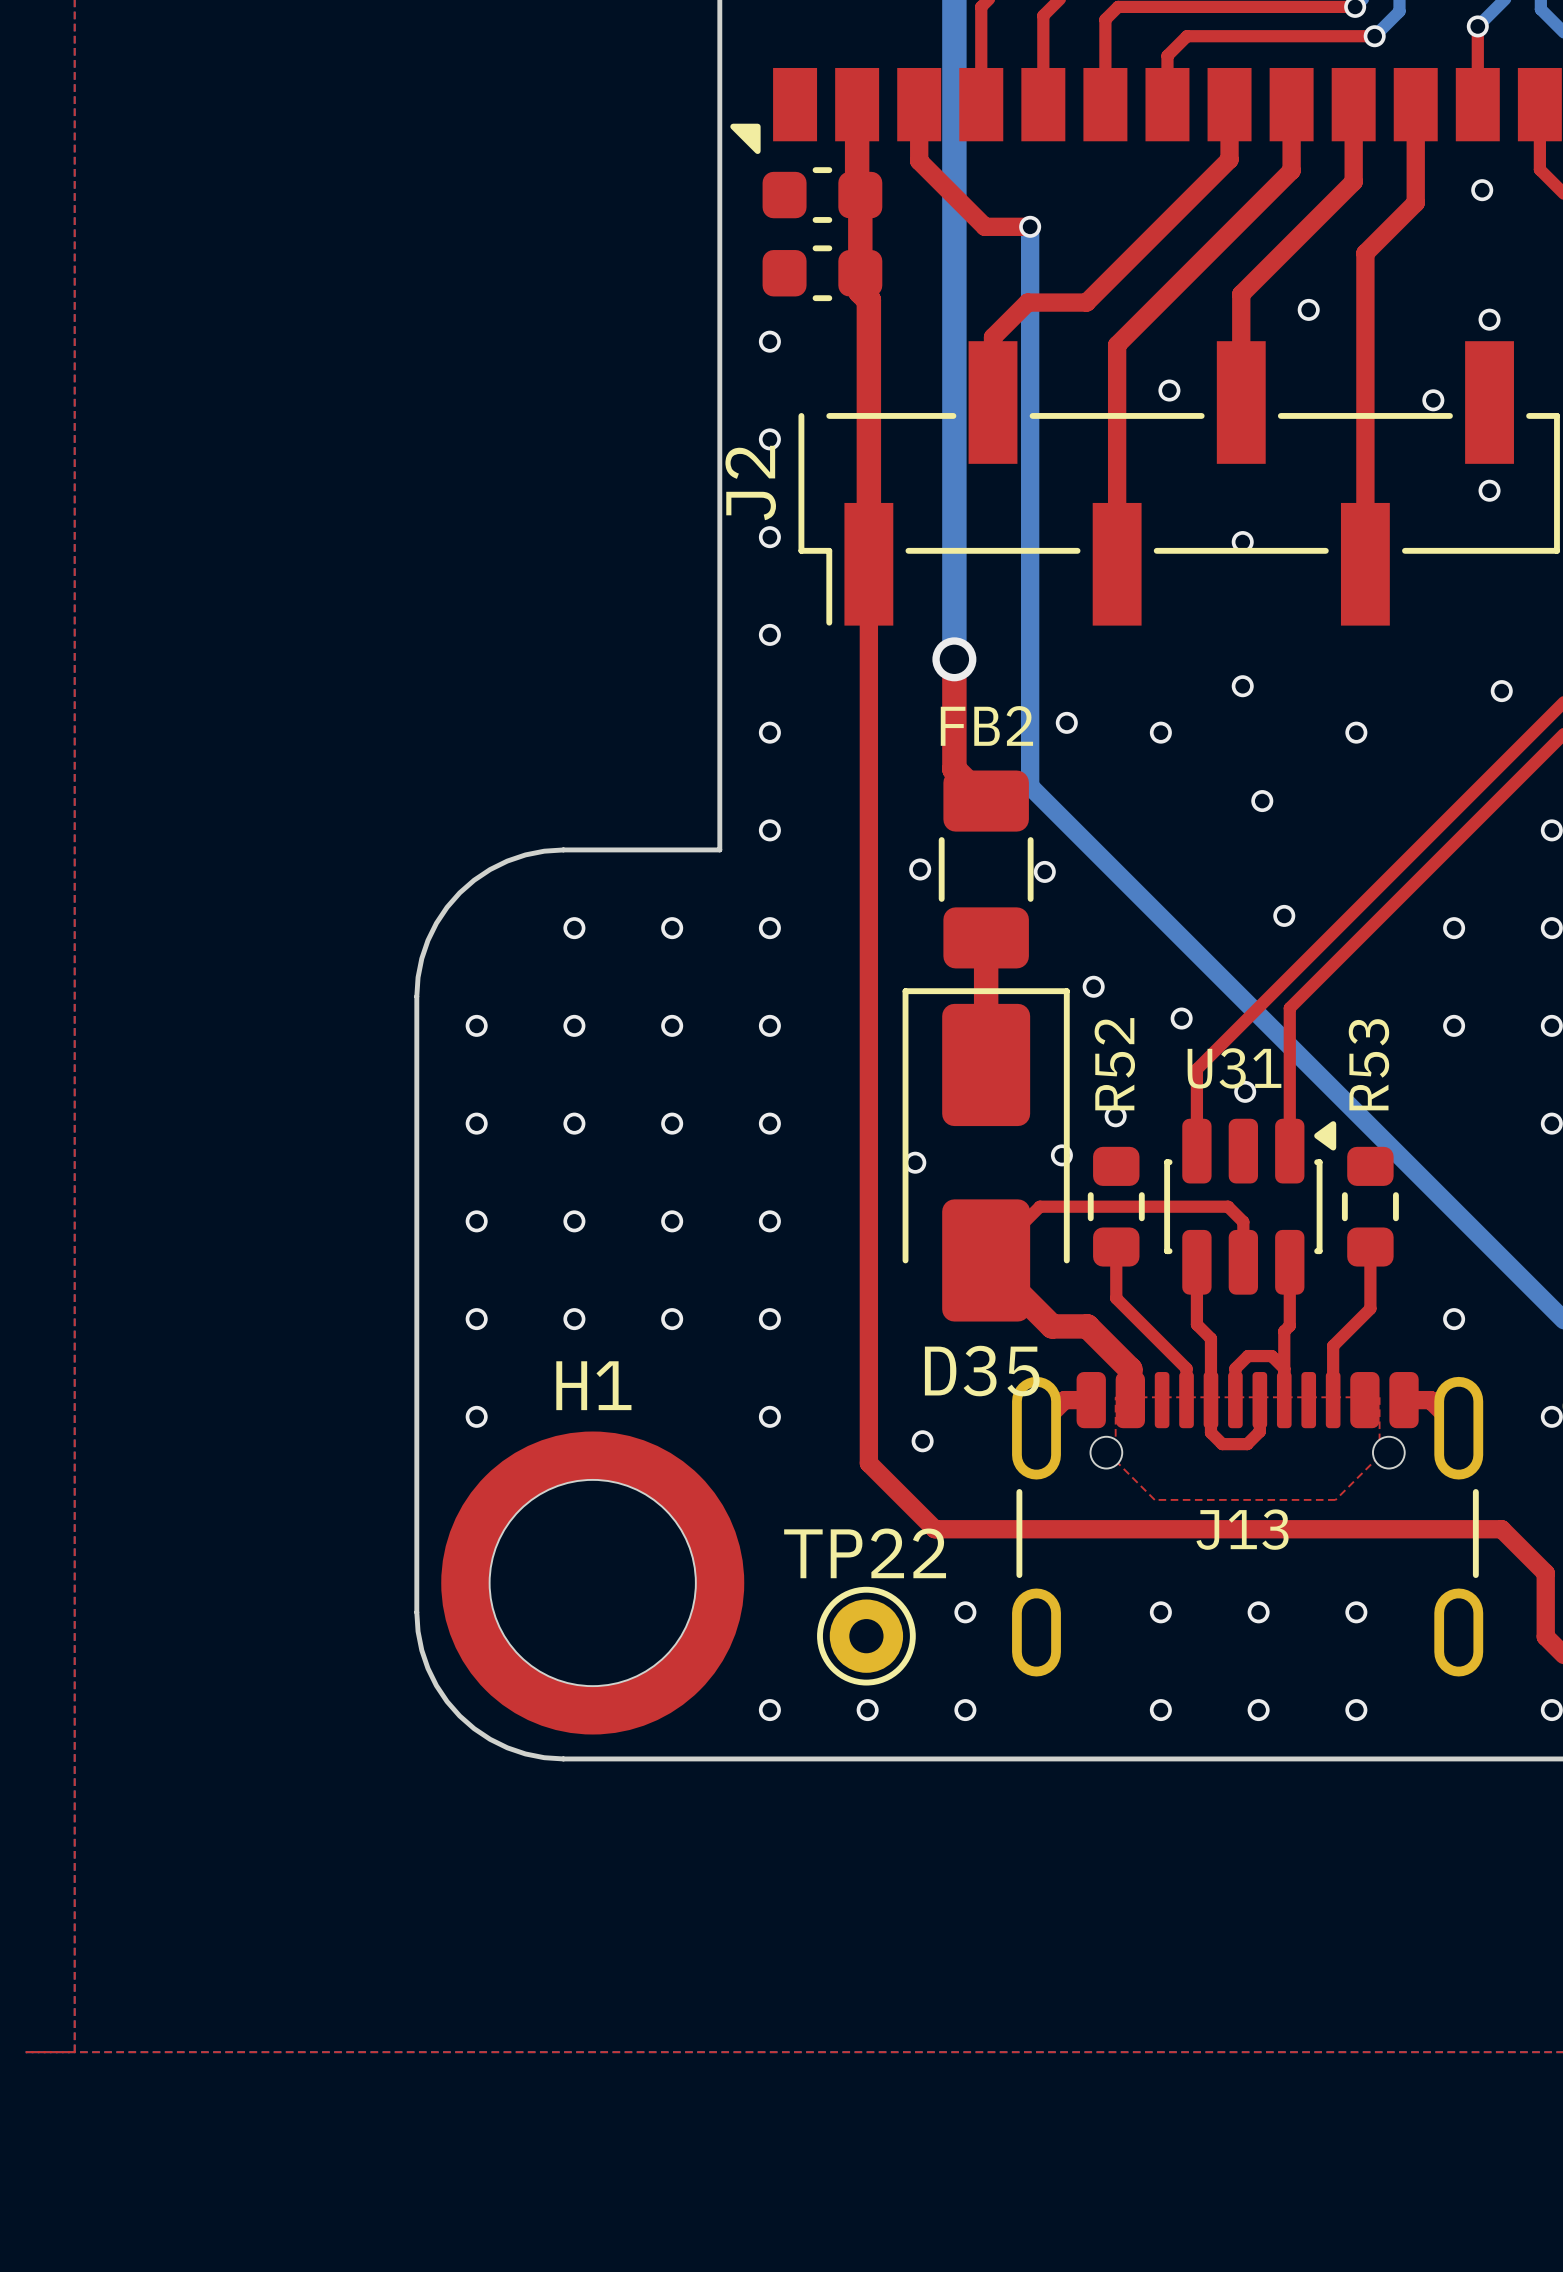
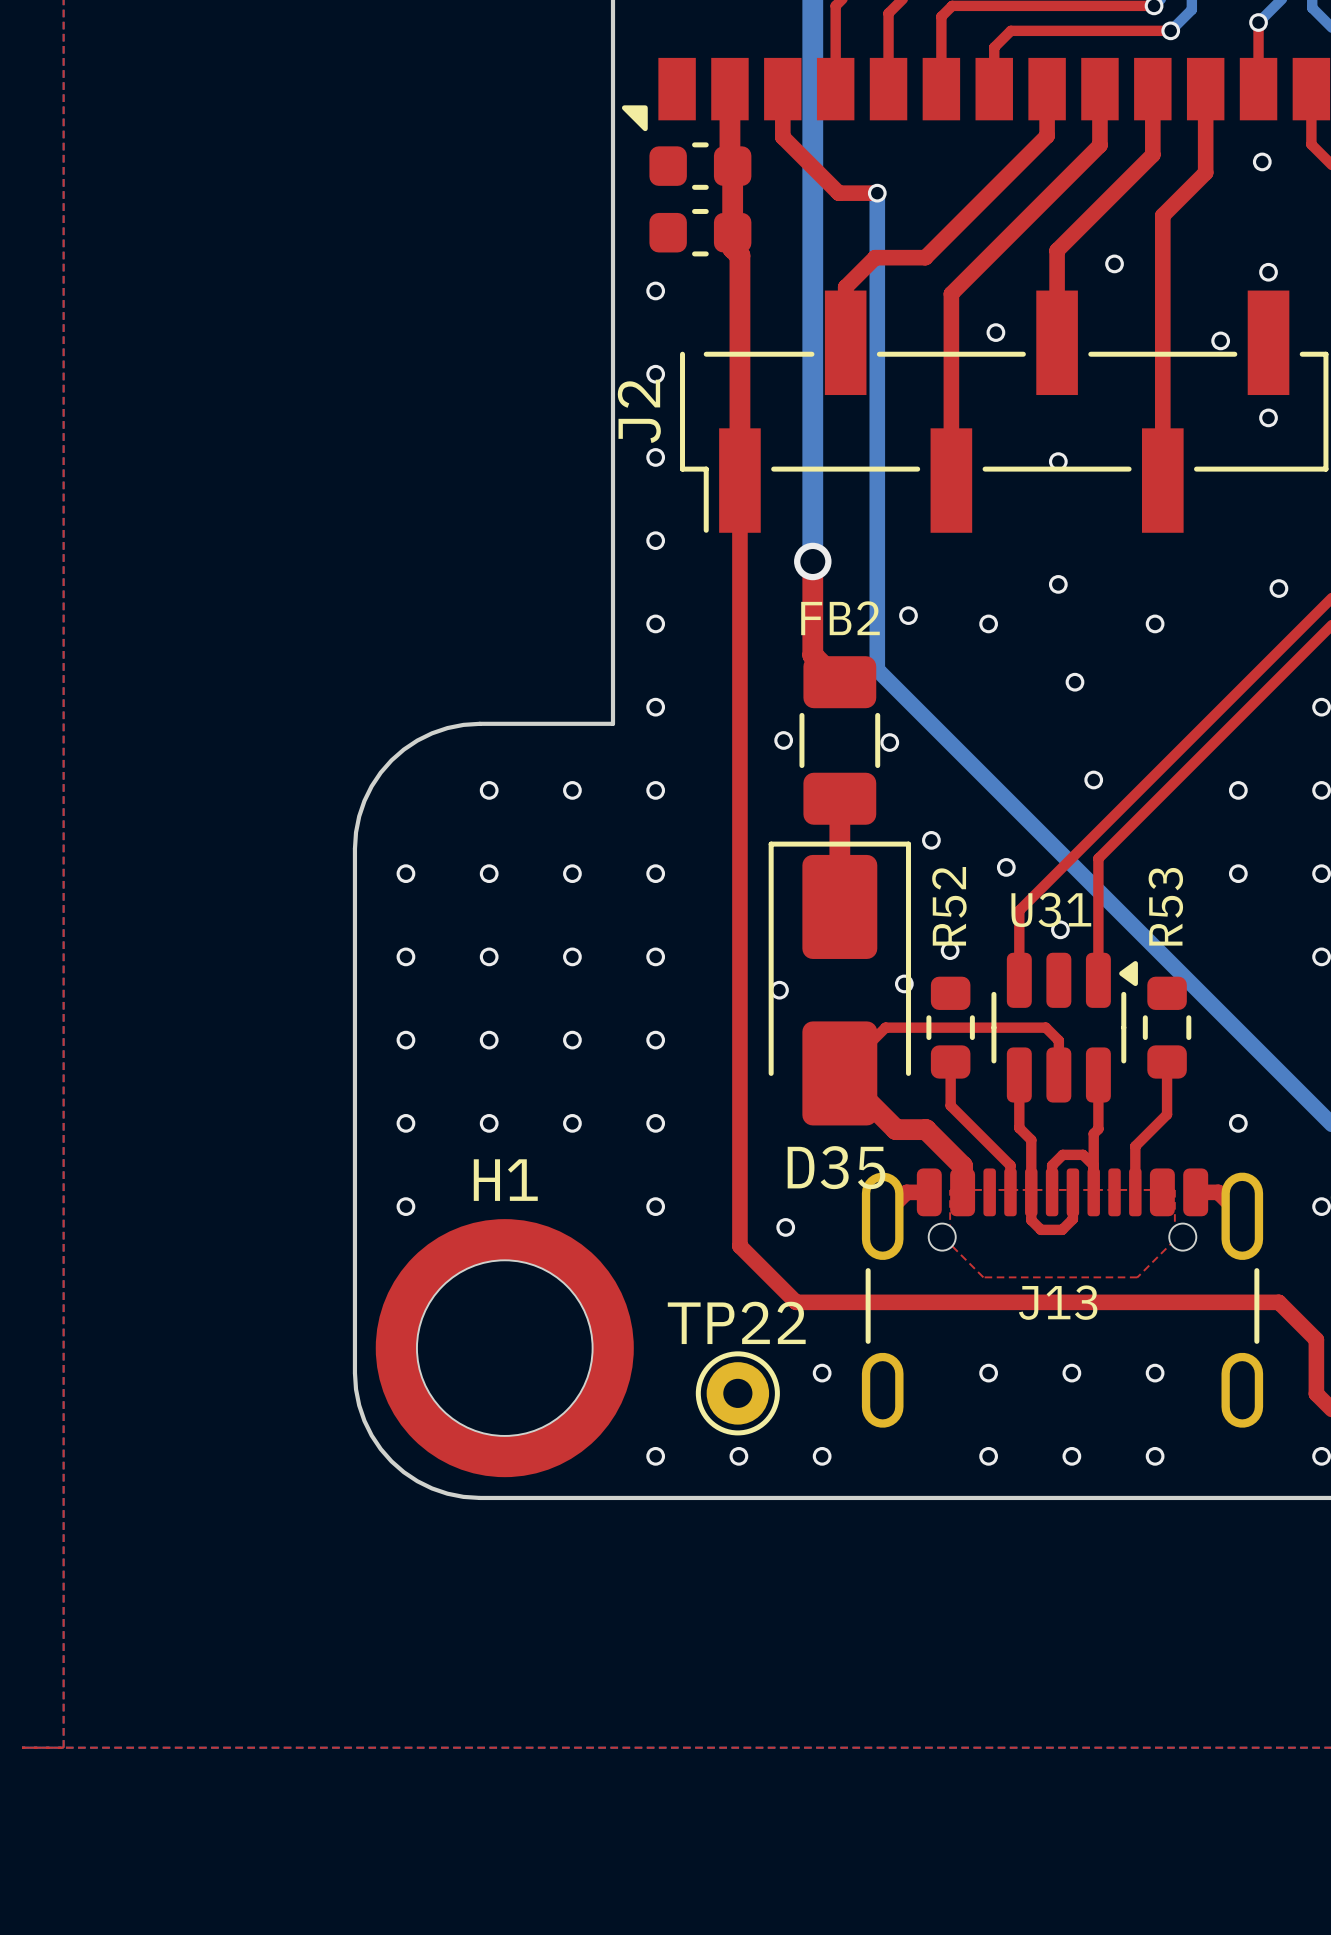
U31 footprint: [1164, 1118, 1337, 1295] -> [991, 952, 1138, 1103]

